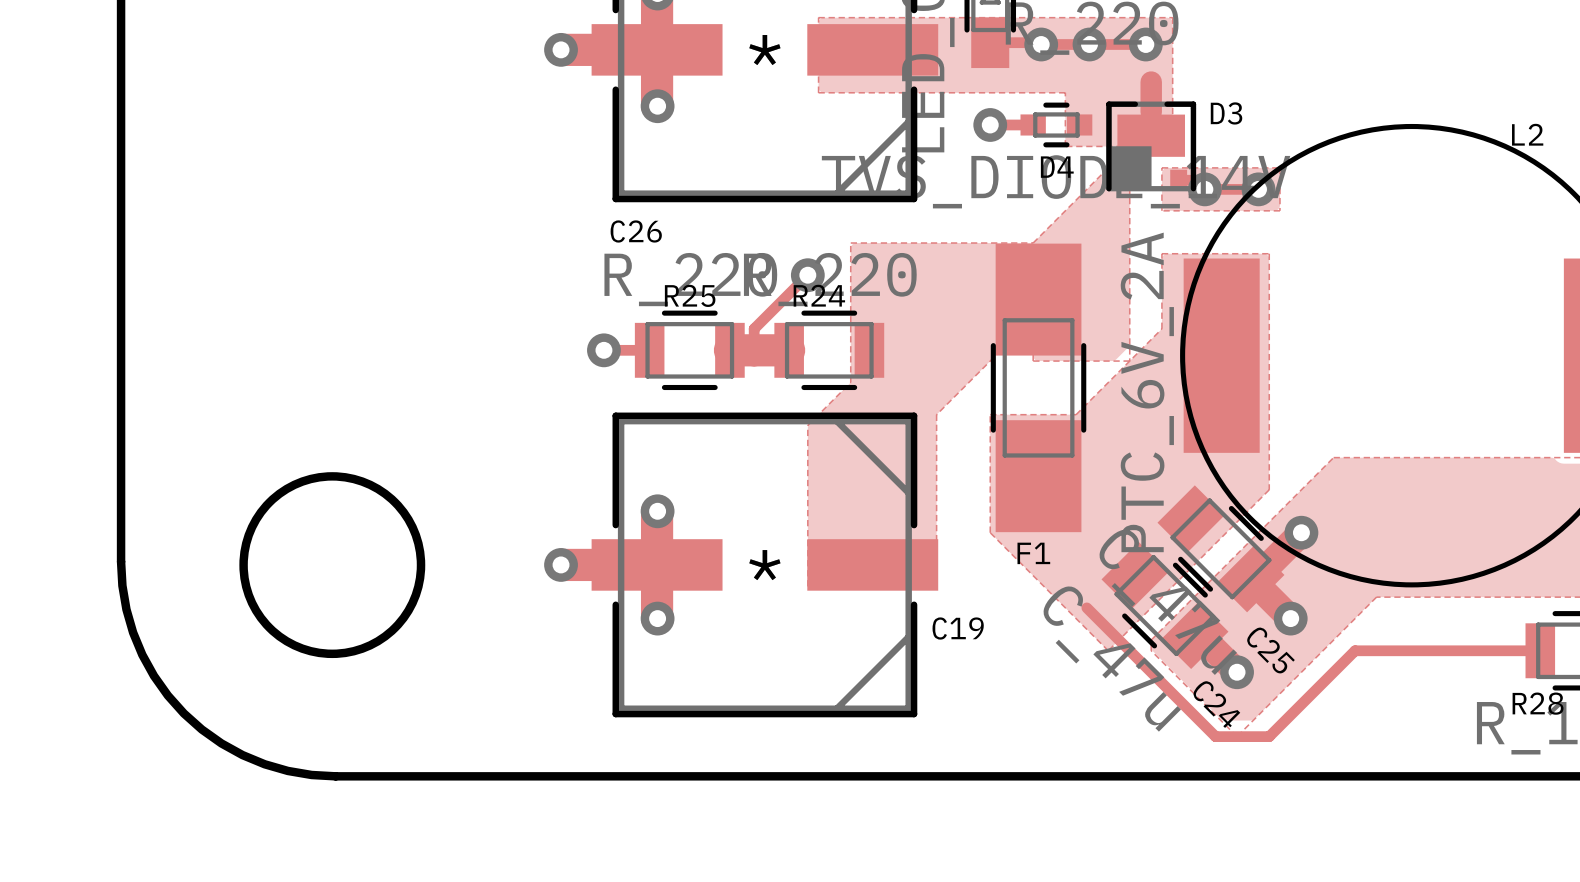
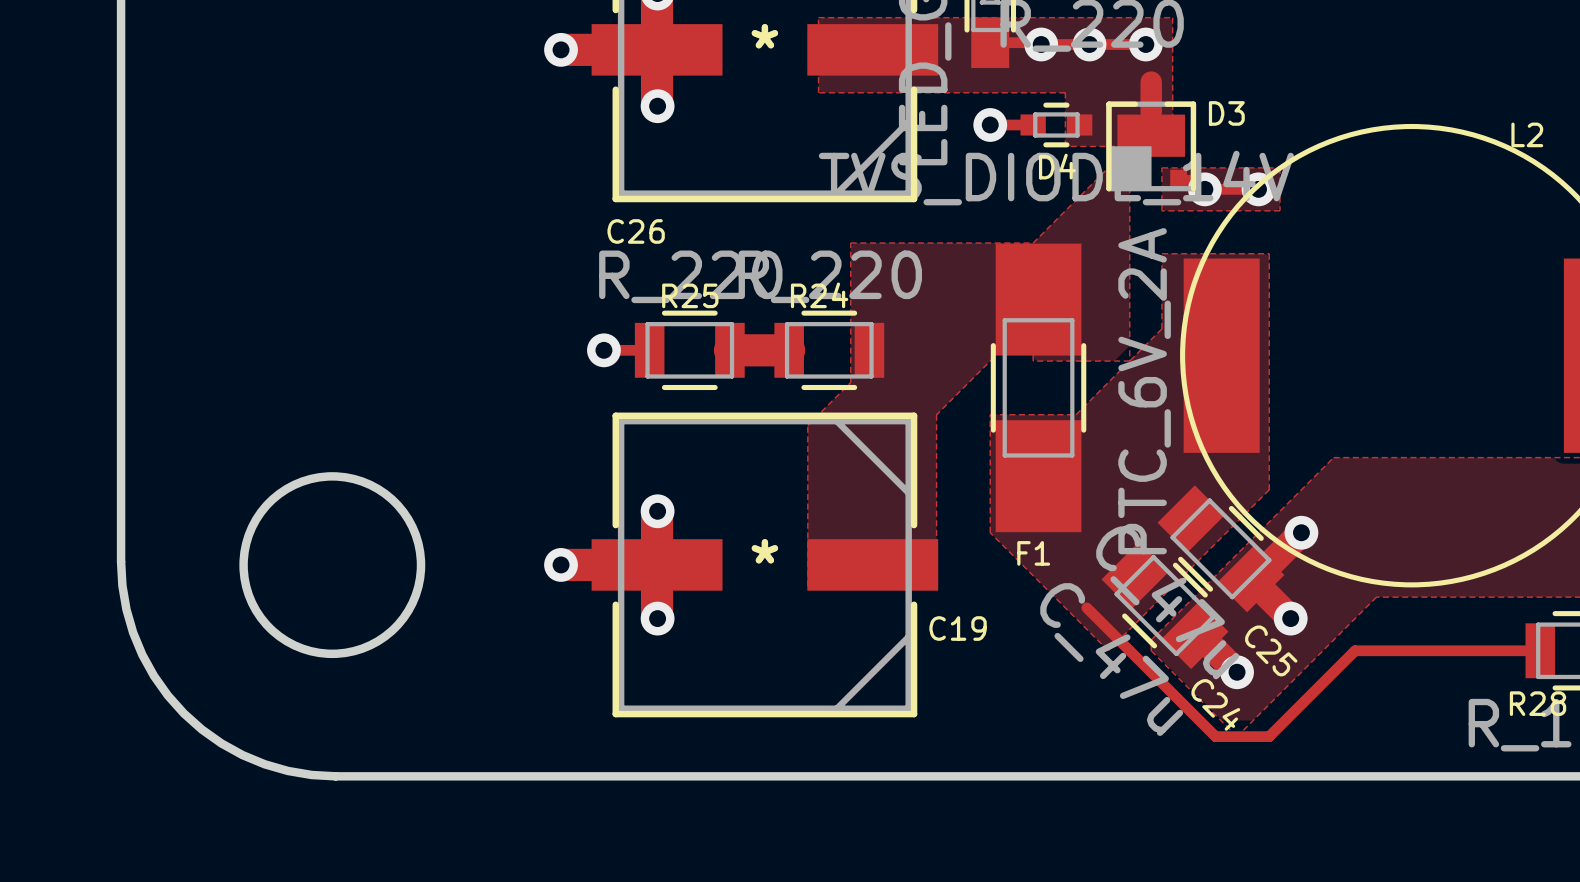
track: (807, 275) (754, 328) (754, 350) -> none
via: (807, 275) -> none

